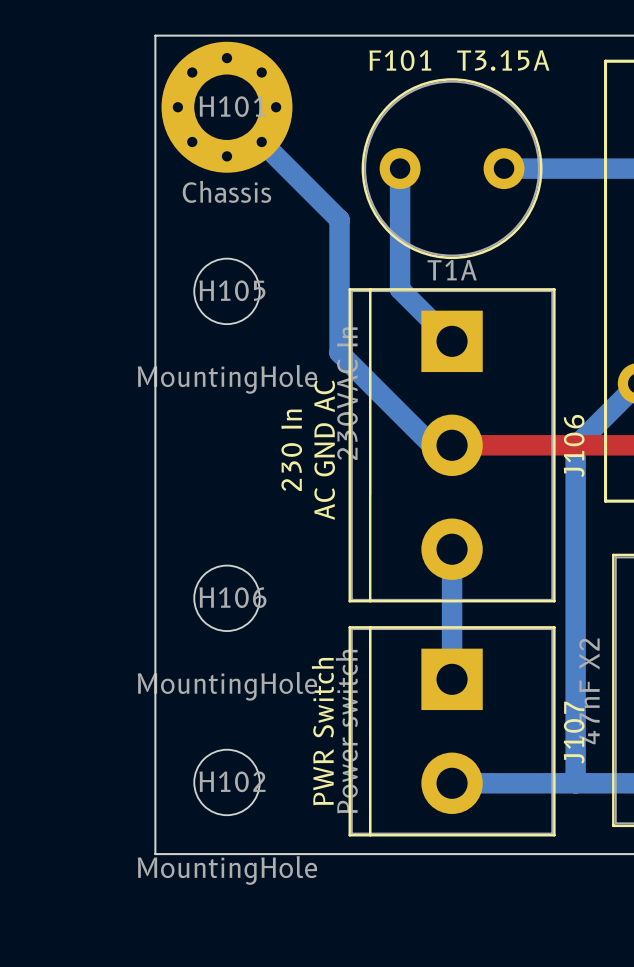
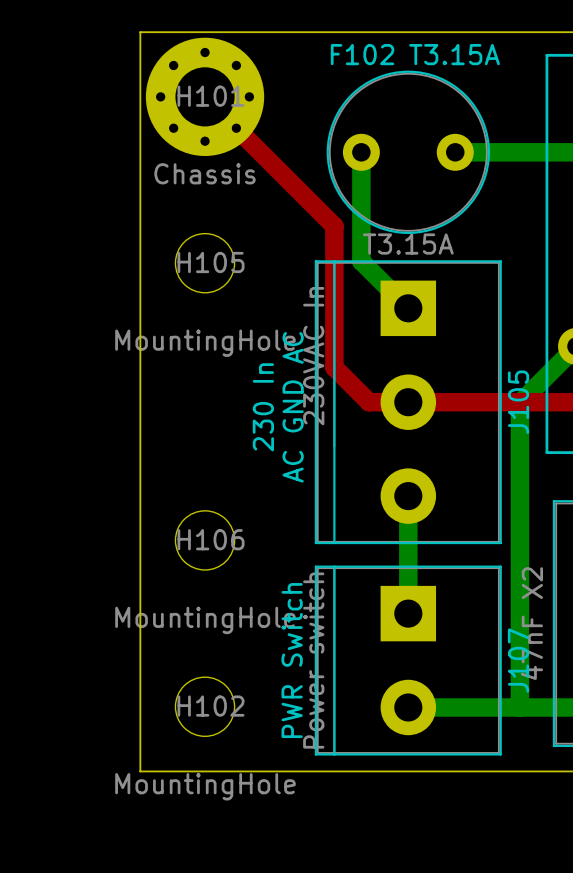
F101 name: F101 (400, 60) -> F102 (362, 54)
bottom track: (226, 107) (339, 219) (339, 352) (432, 445) (452, 445) -> none
top track: none -> (205, 96) (334, 226) (334, 367) (369, 402) (408, 402)
F101 value: T1A (452, 270) -> T3.15A (408, 244)
J106 name: J106 (574, 446) -> J105 (518, 402)

